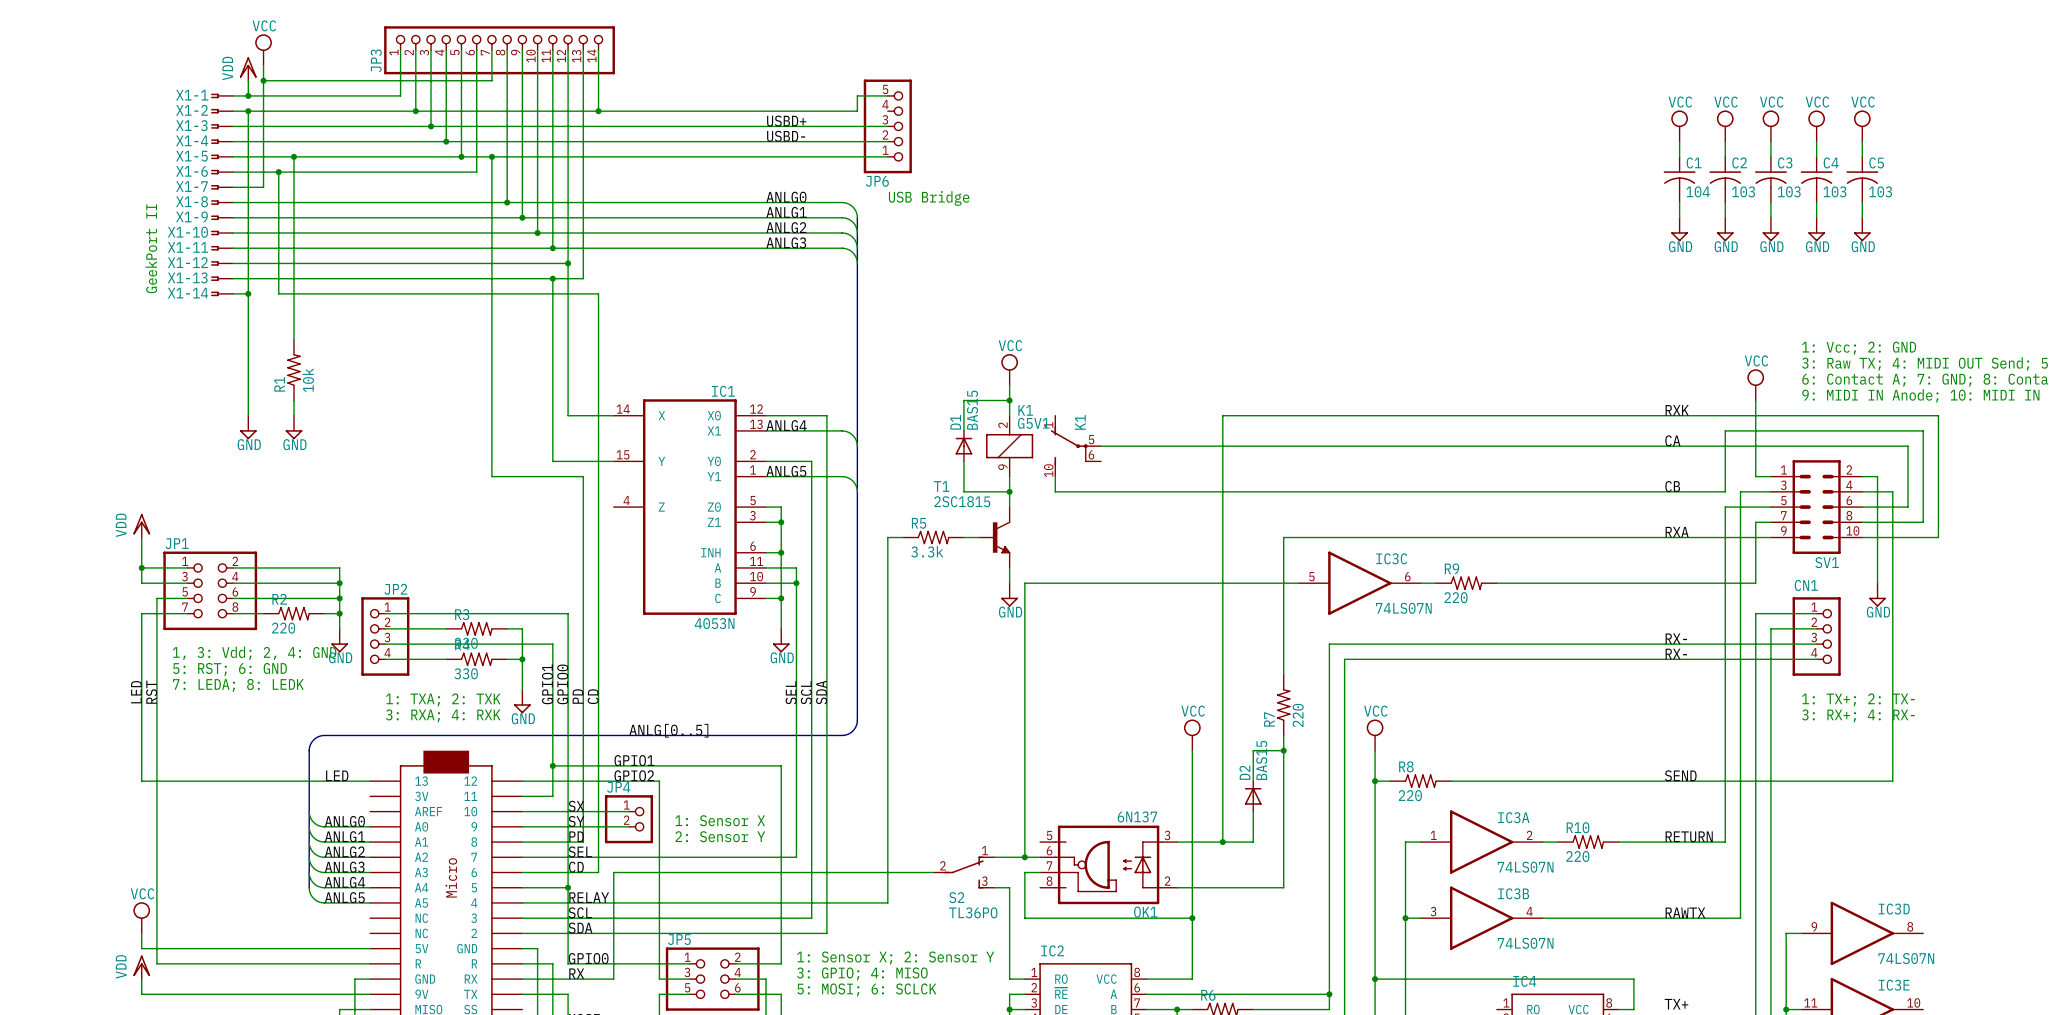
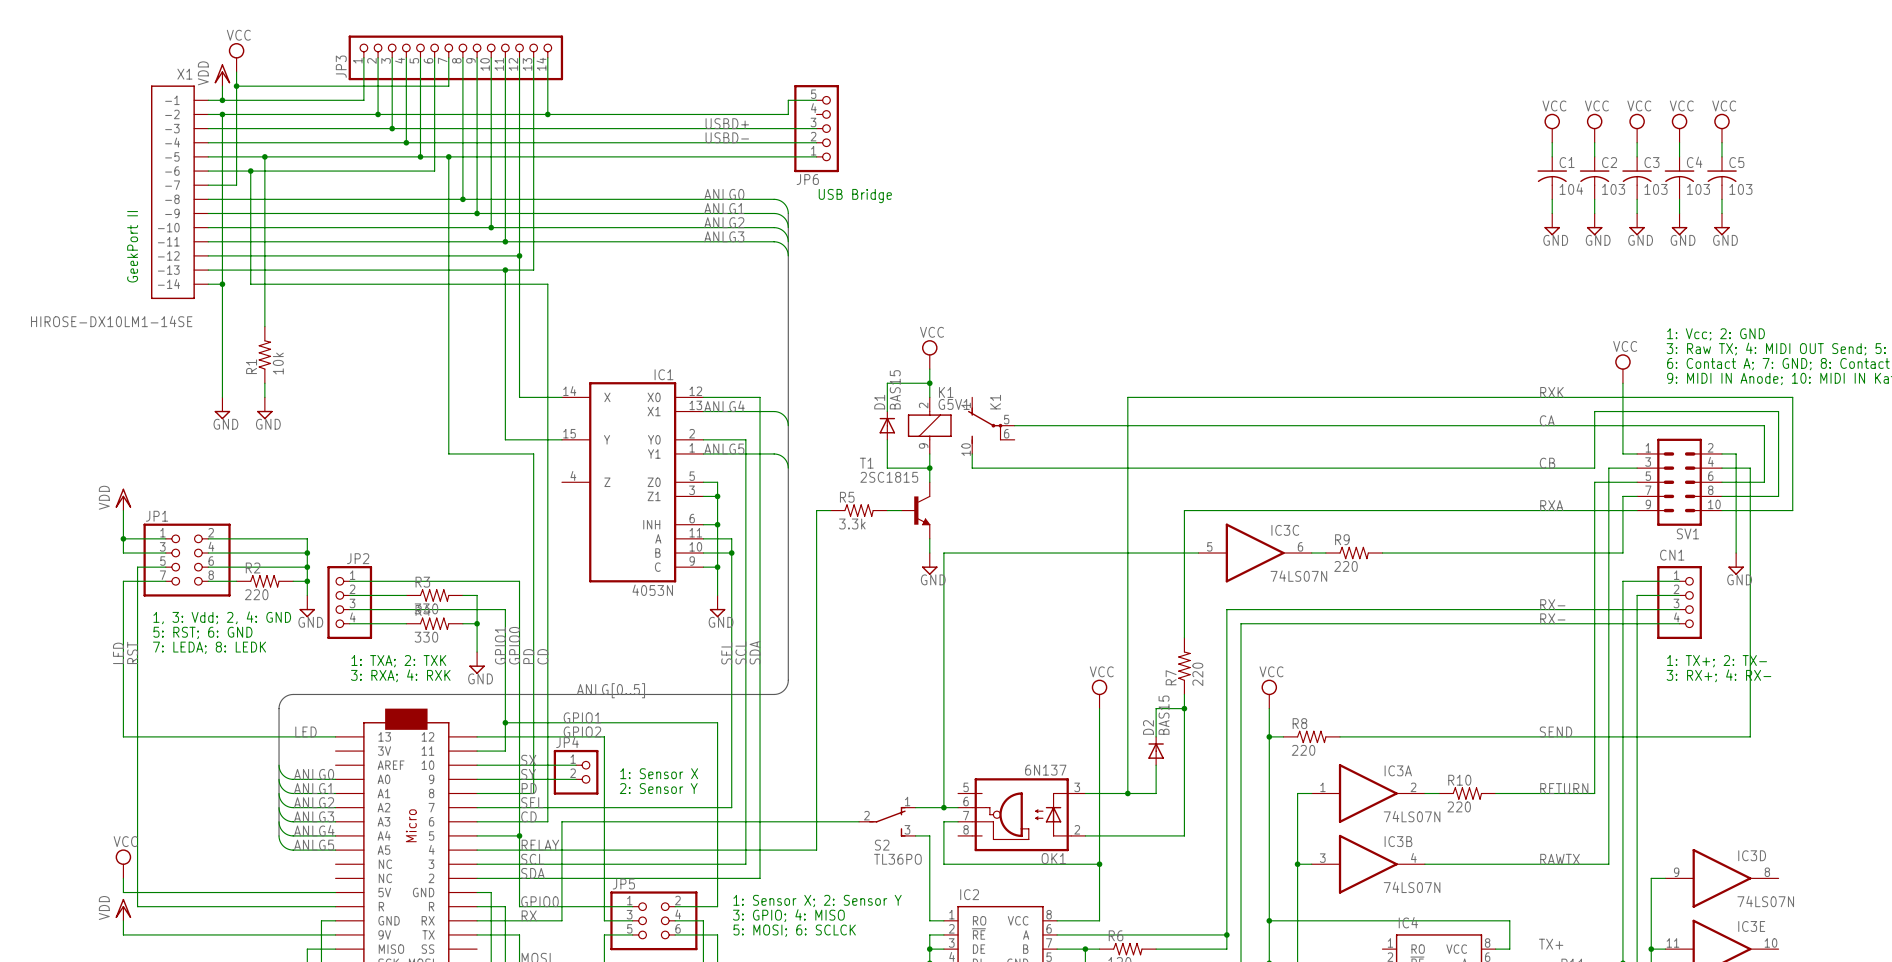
X1-1: (222, 95) -> none
X1-2: (222, 111) -> none
X1-3: (222, 126) -> none
X1-4: (222, 141) -> none
X1-5: (222, 156) -> none
X1-6: (222, 172) -> none
X1-7: (222, 187) -> none
X1: none -> HIROSE-DX10LM1-14SE (179, 192)
X1-8: (222, 202) -> none
X1-9: (222, 217) -> none
X1-10: (222, 233) -> none
X1-11: (222, 248) -> none
X1-12: (222, 263) -> none
X1-13: (222, 278) -> none
X1-14: (222, 293) -> none

